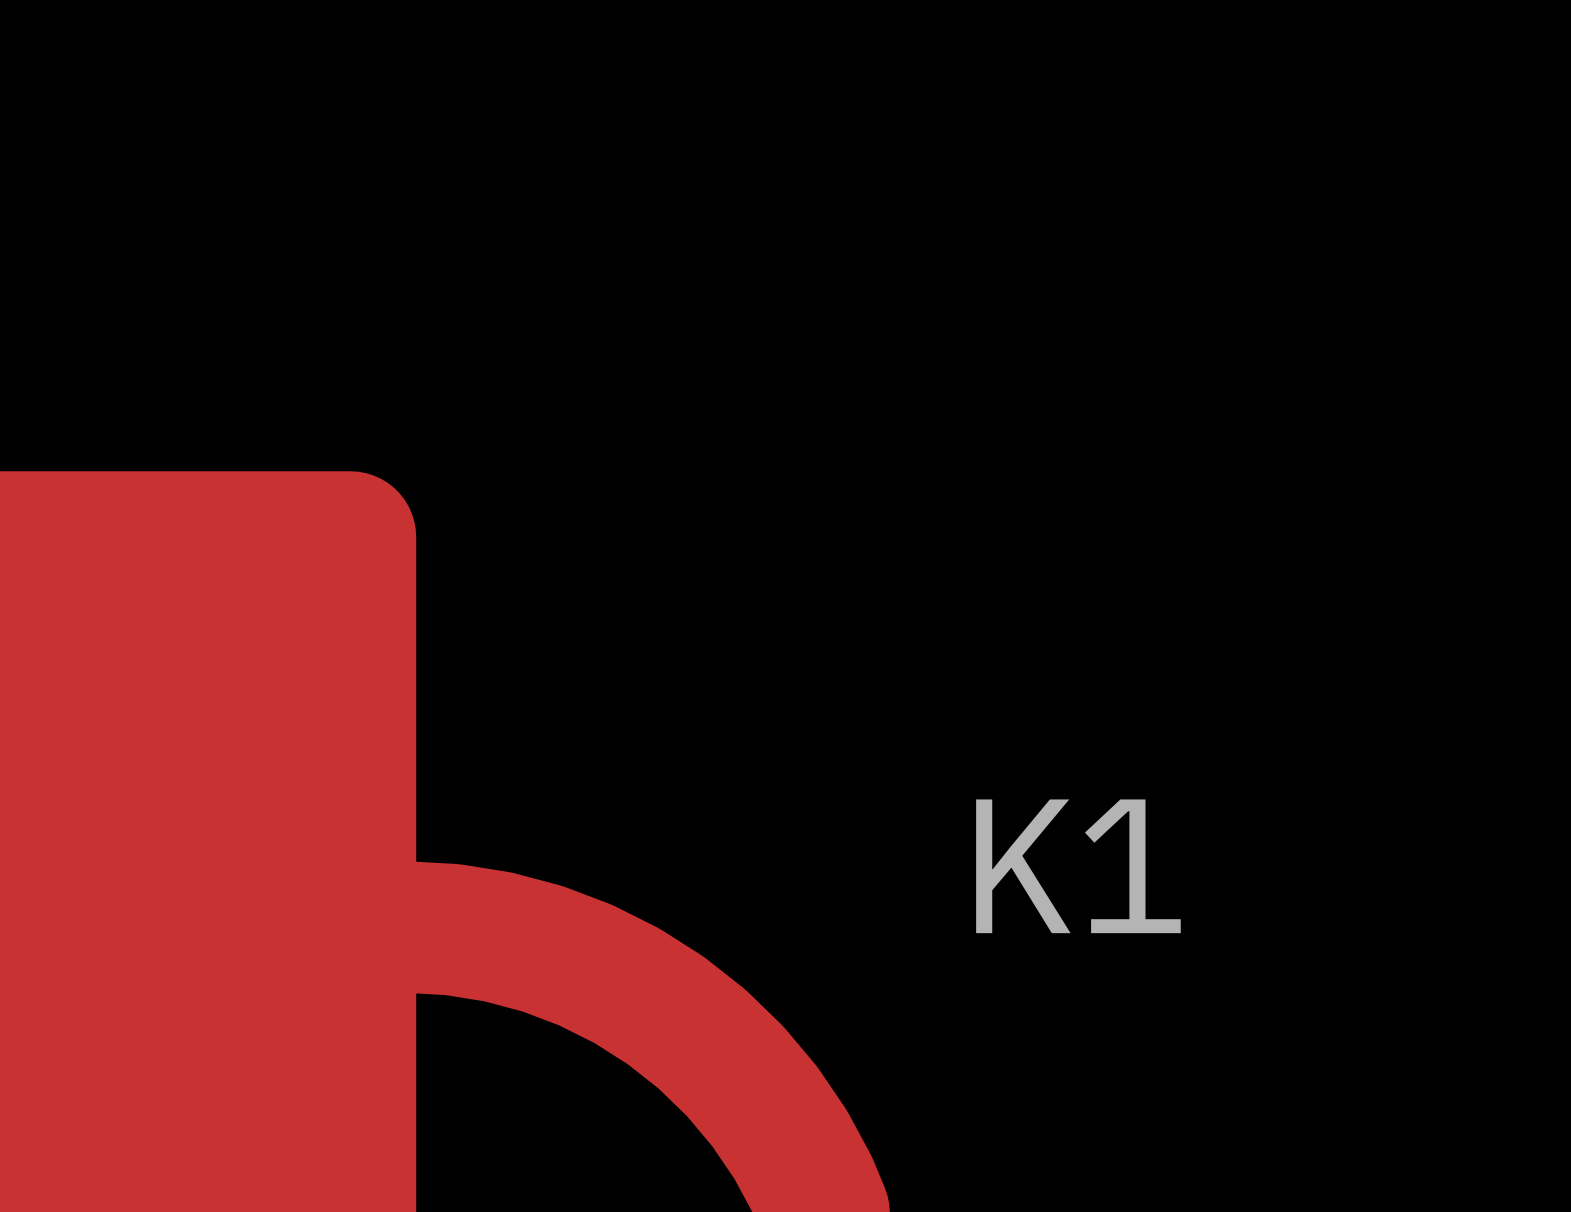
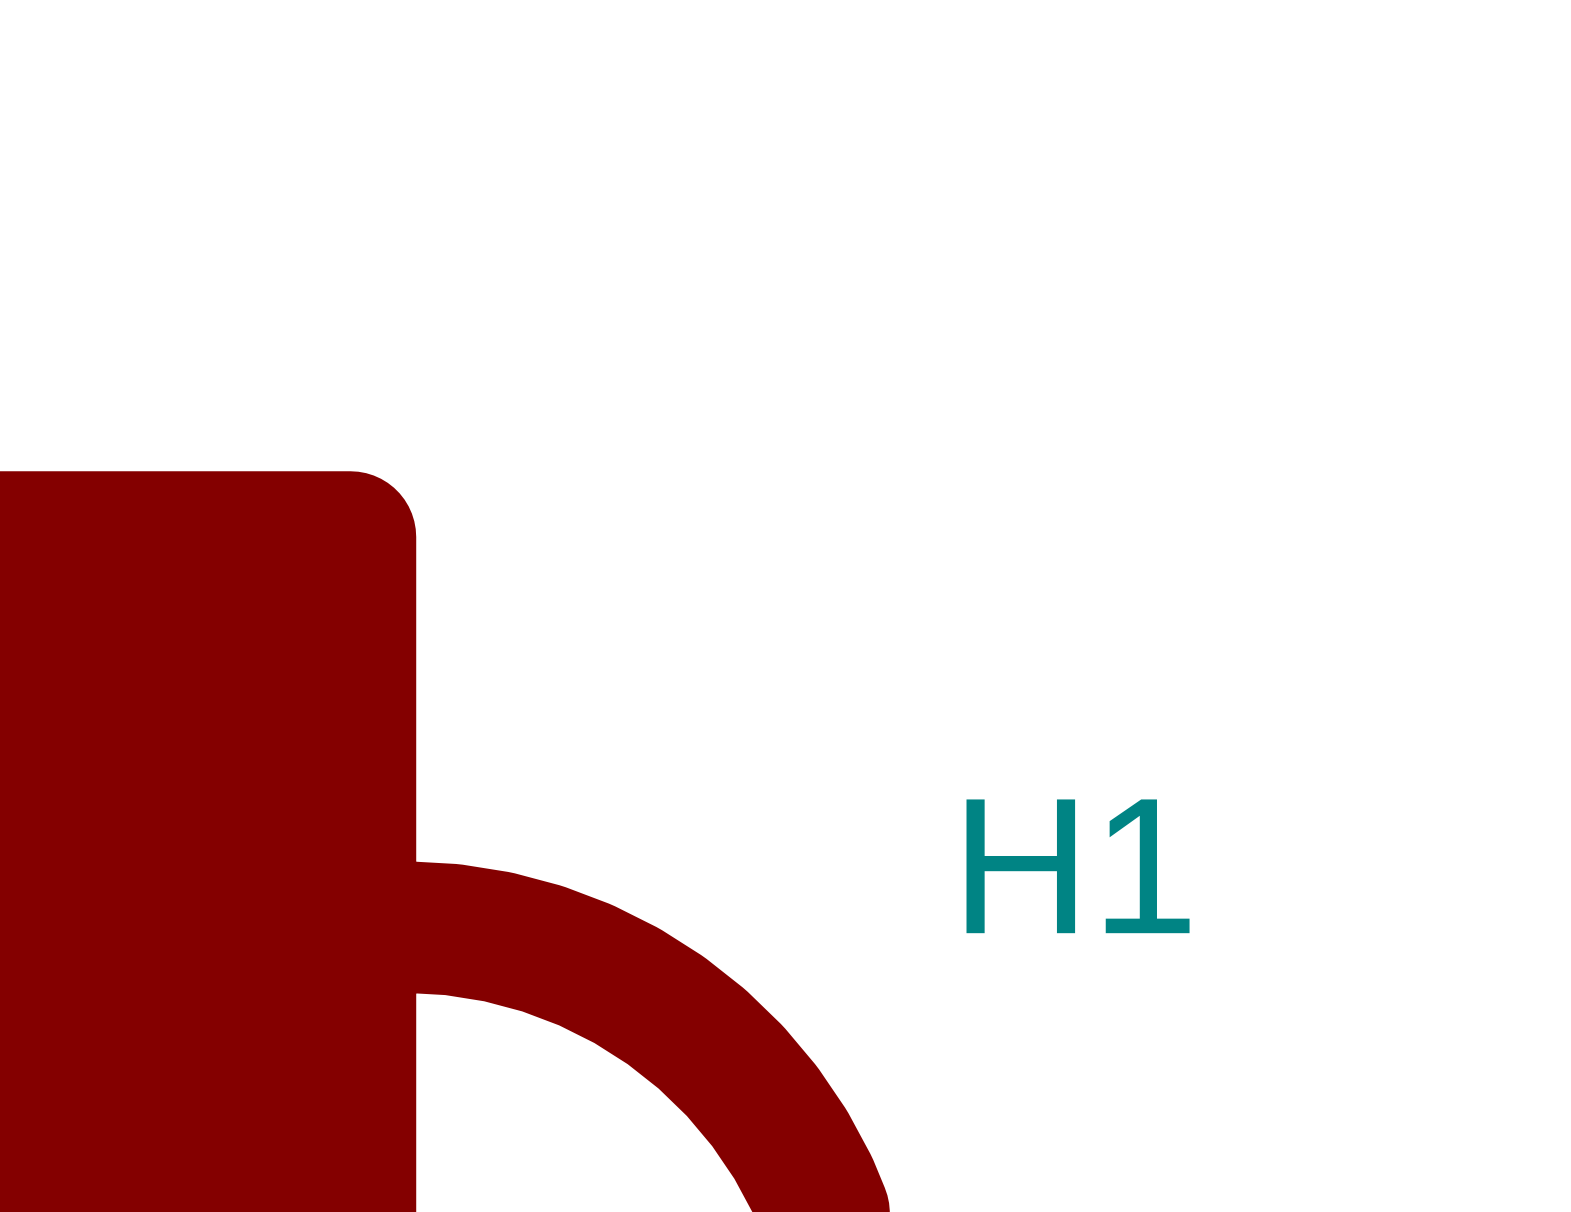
K1 name: K1 (1078, 866) -> H1 (1078, 866)

